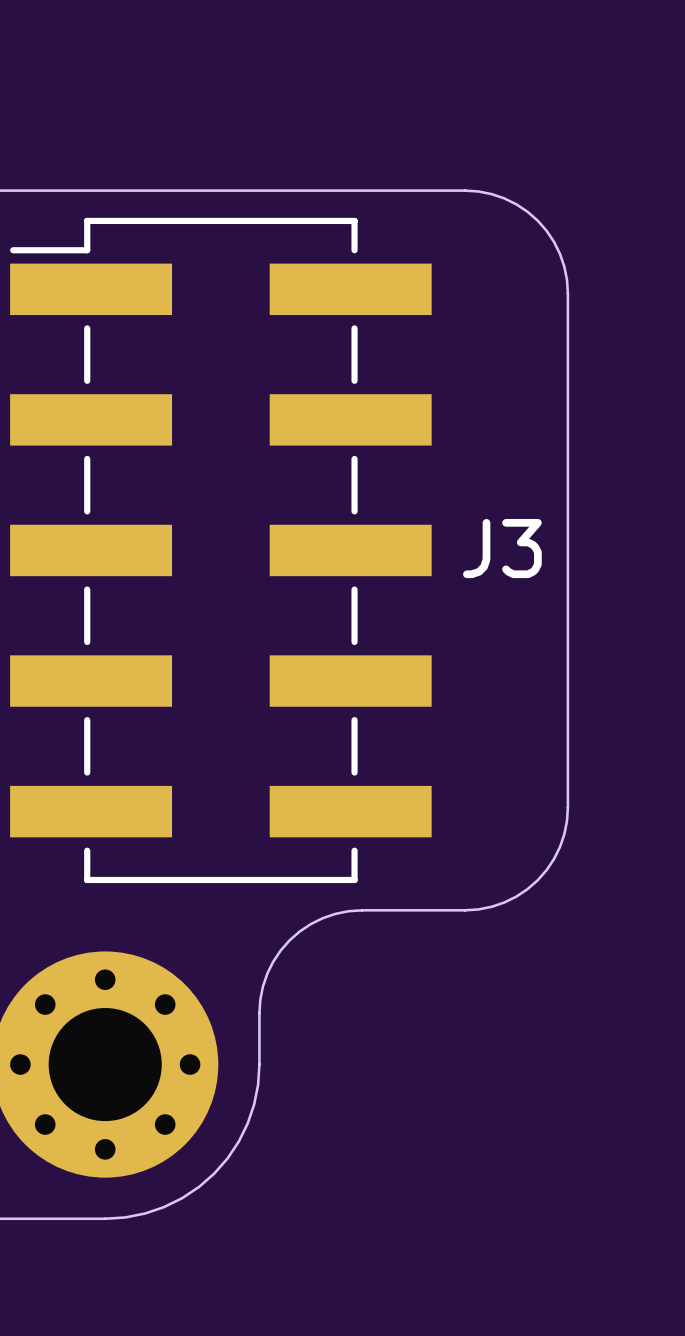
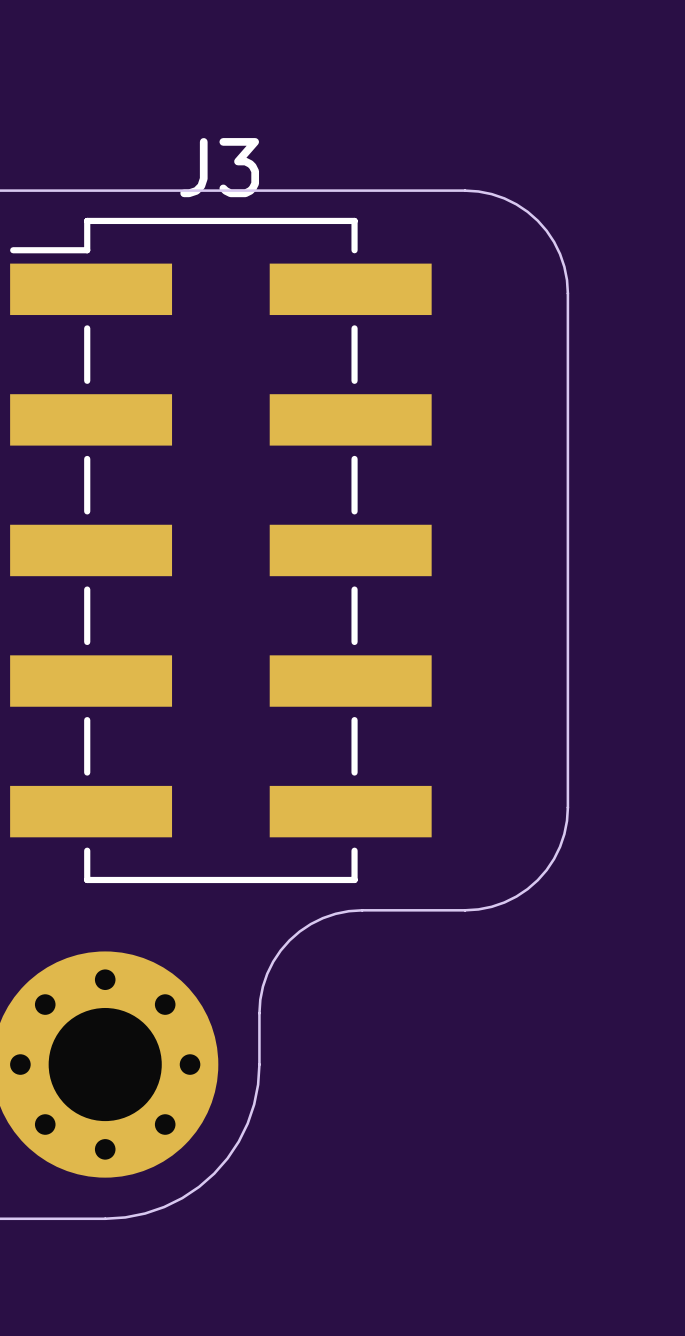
J3 name position: J3 (502, 548) -> J3 (219, 167)

